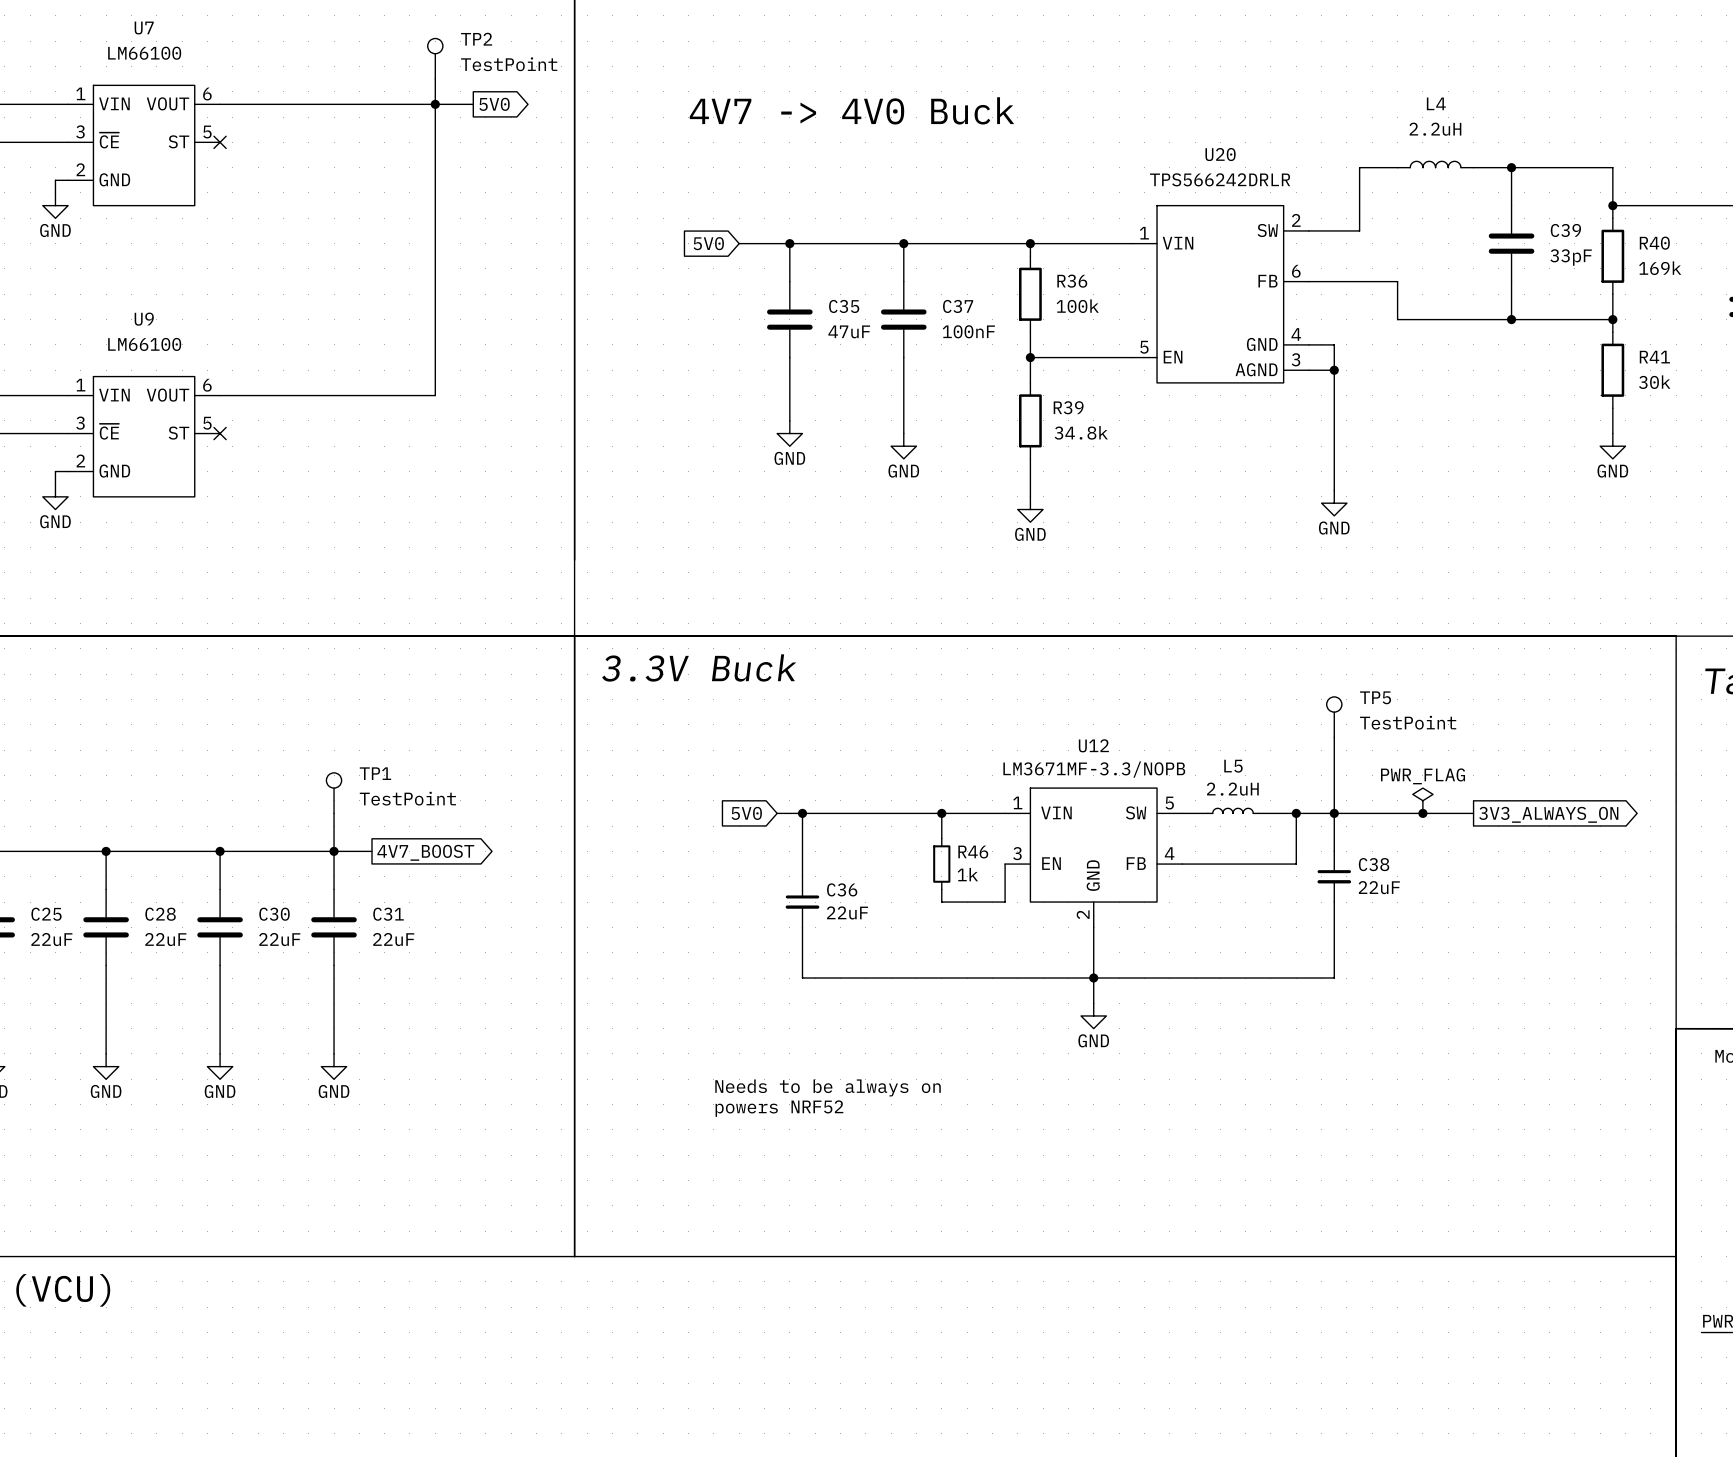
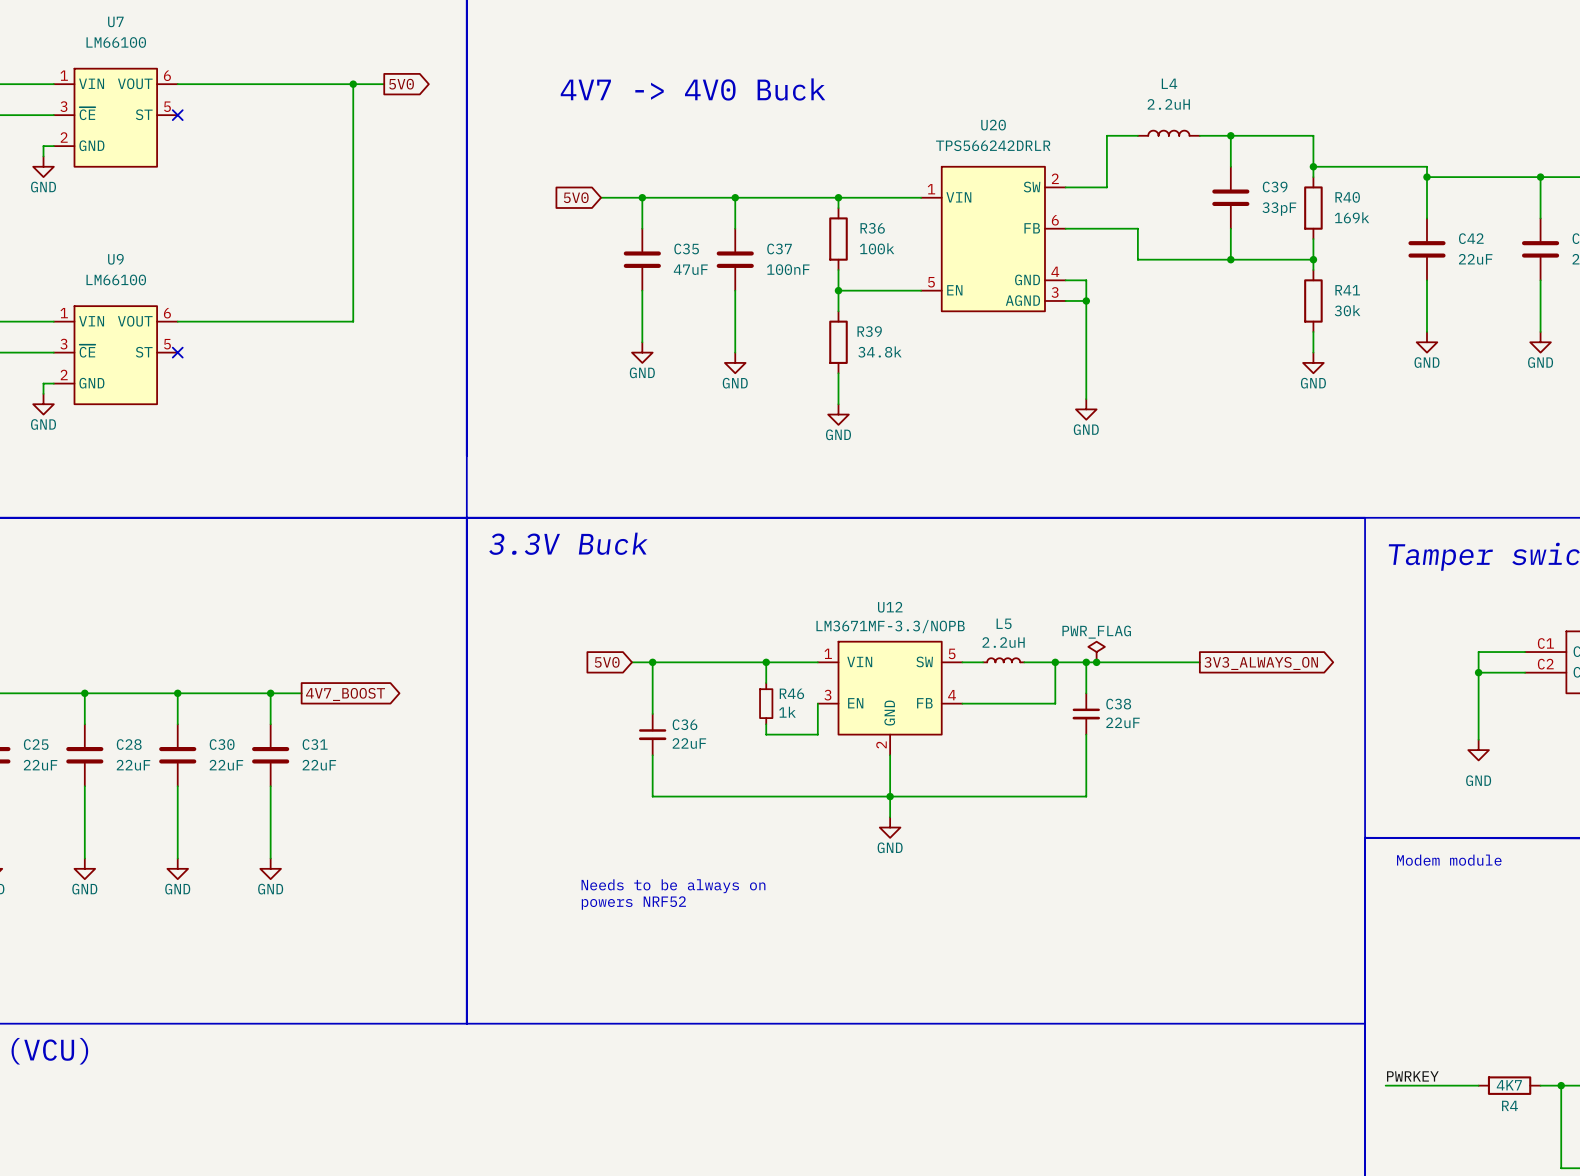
TP2: TestPoint (435, 58) -> none
wire: (435, 79) (435, 104) -> none
TP5: TestPoint (1334, 717) -> none
wire: (1334, 737) (1334, 813) -> none
TP1: TestPoint (334, 793) -> none
power symbol position: PWR_FLAG (1422, 800) -> PWR_FLAG (1096, 652)
wire: (334, 813) (334, 851) -> none
junction: none -> (1096, 662)
junction: (1422, 813) -> none

